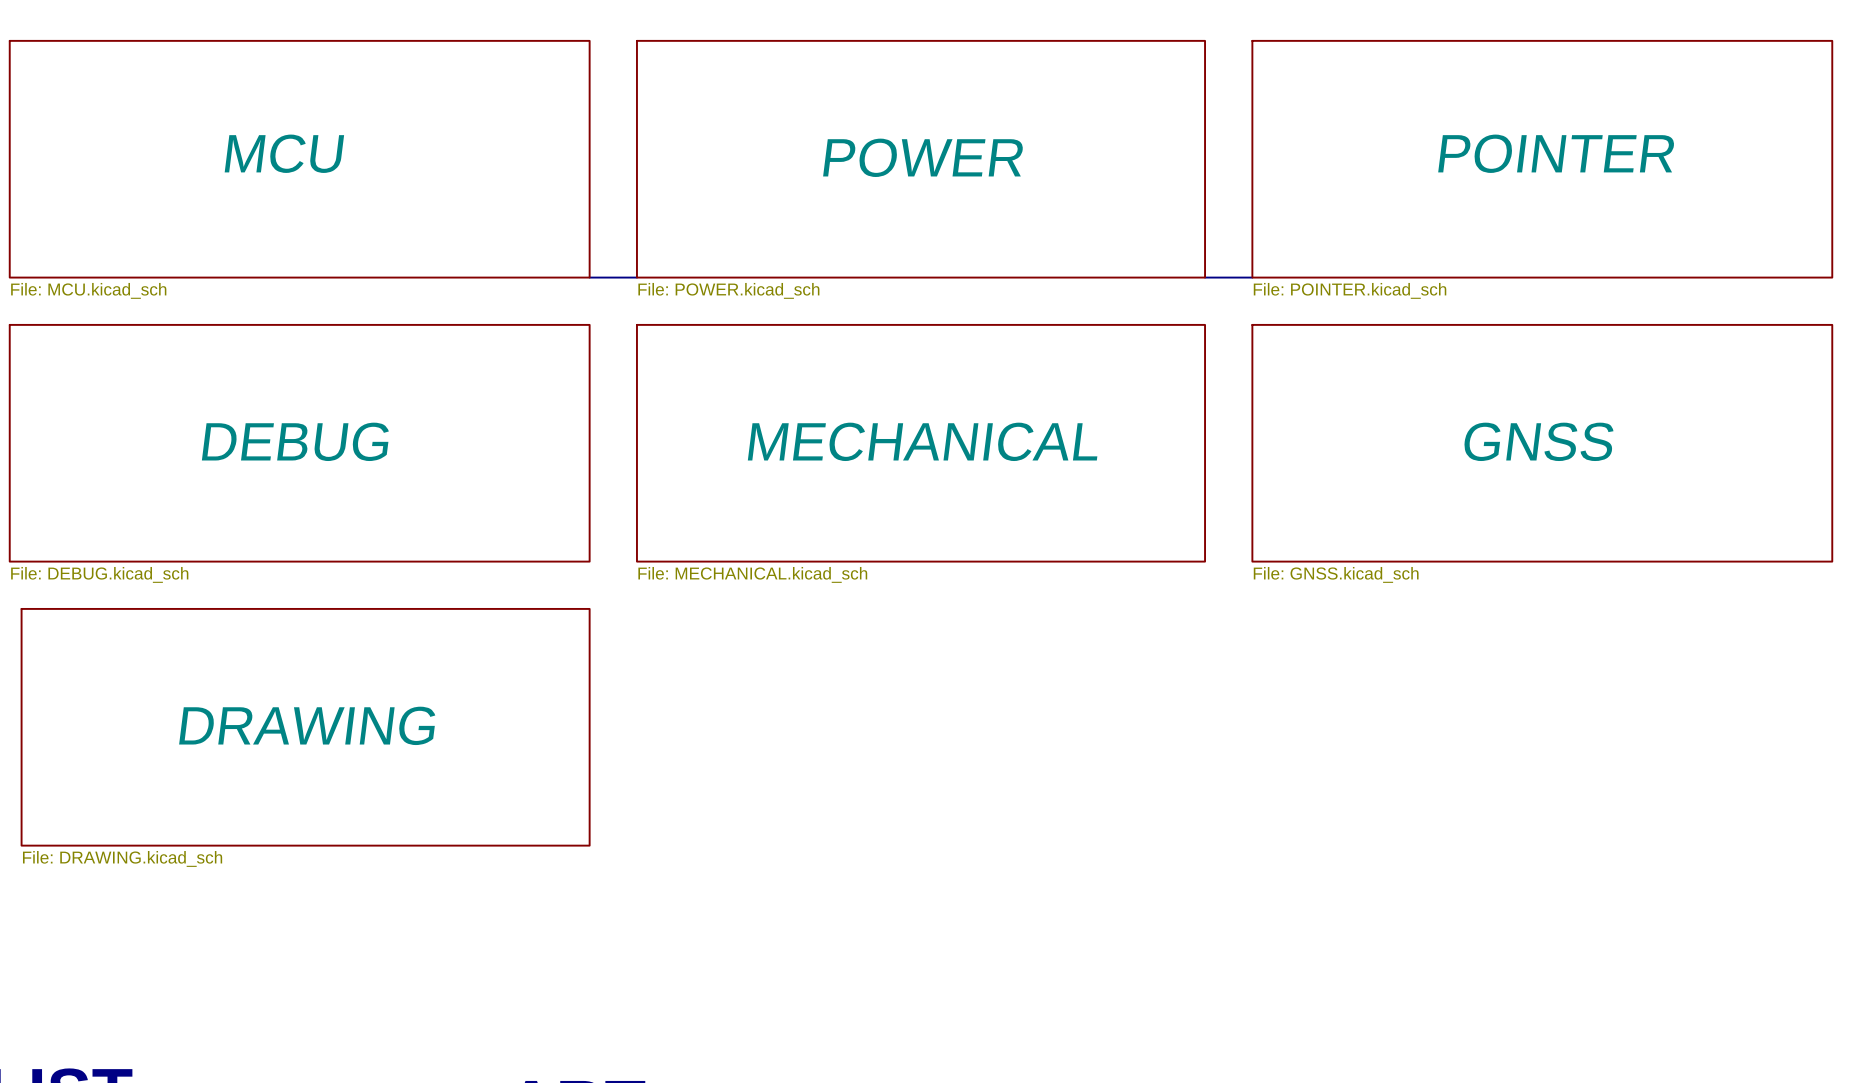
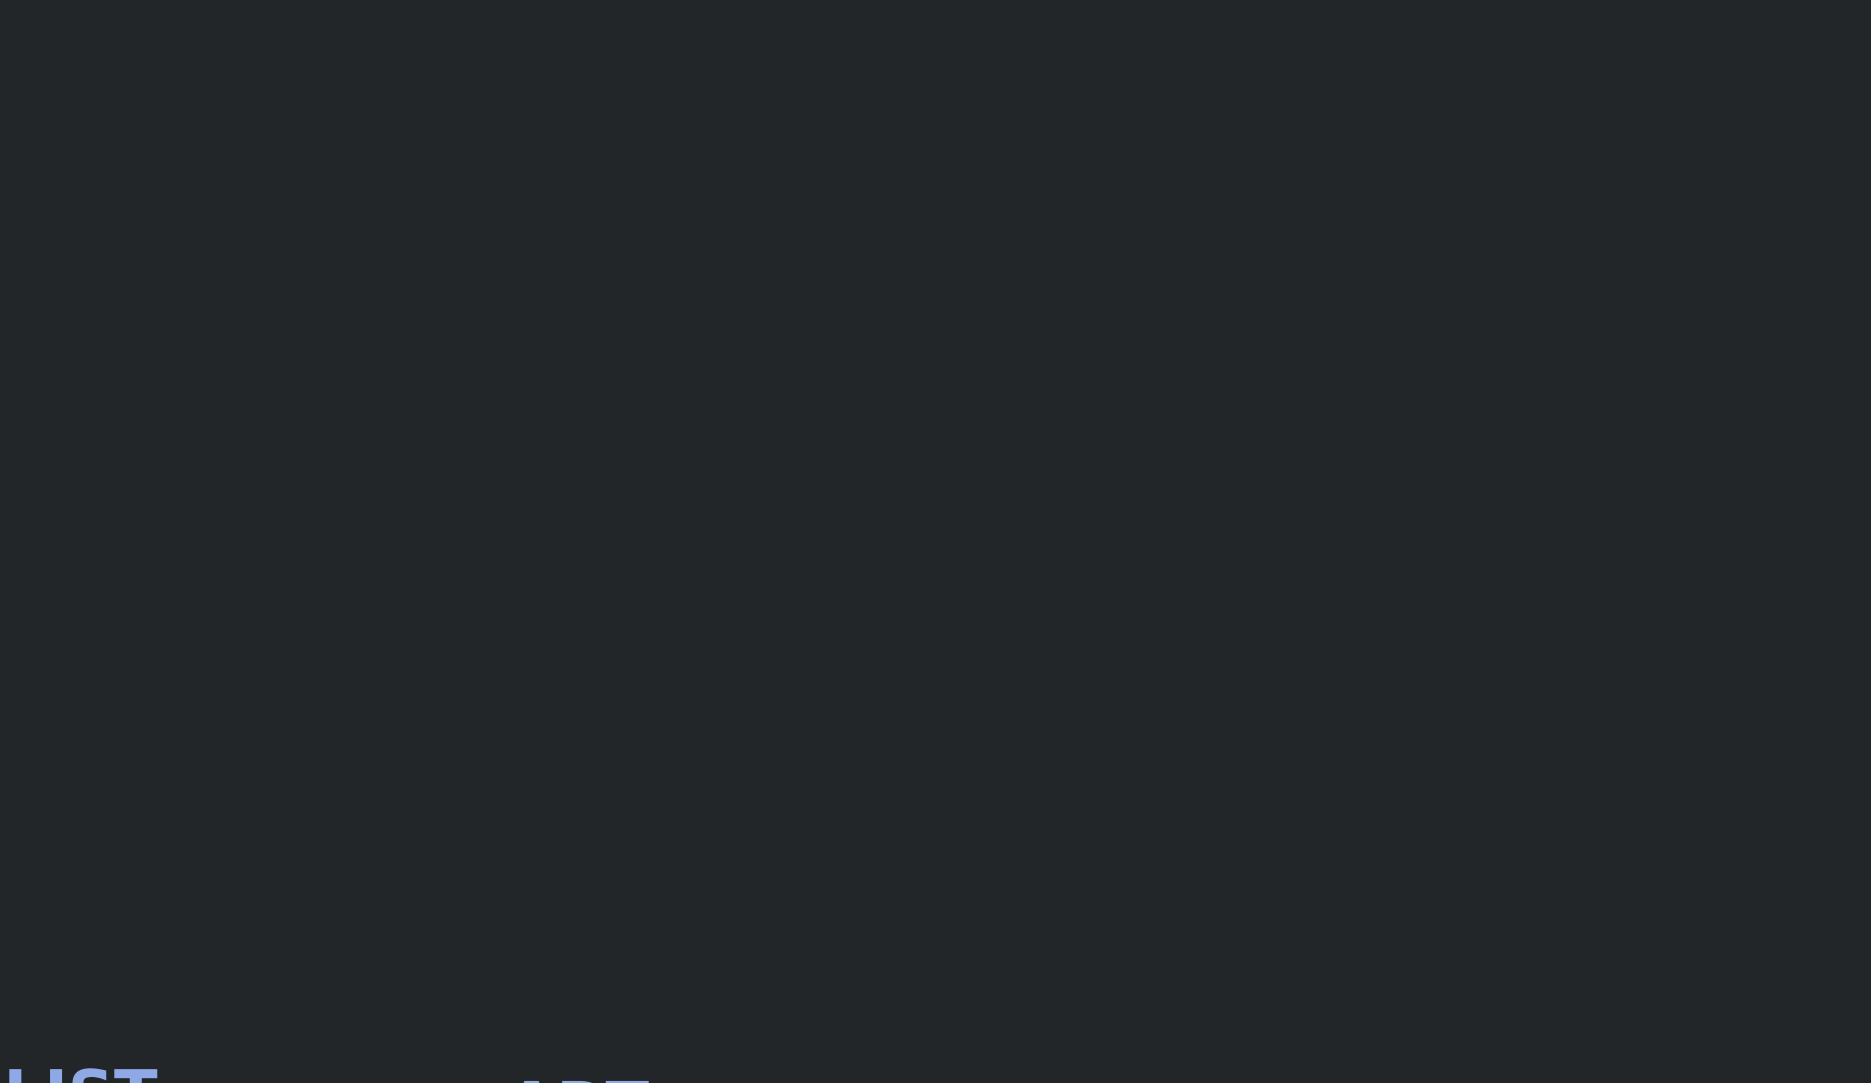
sheet MCU: File: MCU.kicad_sch (299, 159) -> none
sheet POWER: File: POWER.kicad_sch (921, 159) -> none
sheet POINTER: File: POINTER.kicad_sch (1542, 159) -> none
line: (589, 277) (636, 277) -> none
line: (1205, 277) (1252, 277) -> none
sheet DEBUG: File: DEBUG.kicad_sch (299, 443) -> none
sheet MECHANICAL: File: MECHANICAL.kicad_sch (921, 443) -> none
sheet GNSS: File: GNSS.kicad_sch (1542, 443) -> none
sheet DRAWING: File: DRAWING.kicad_sch (305, 727) -> none

